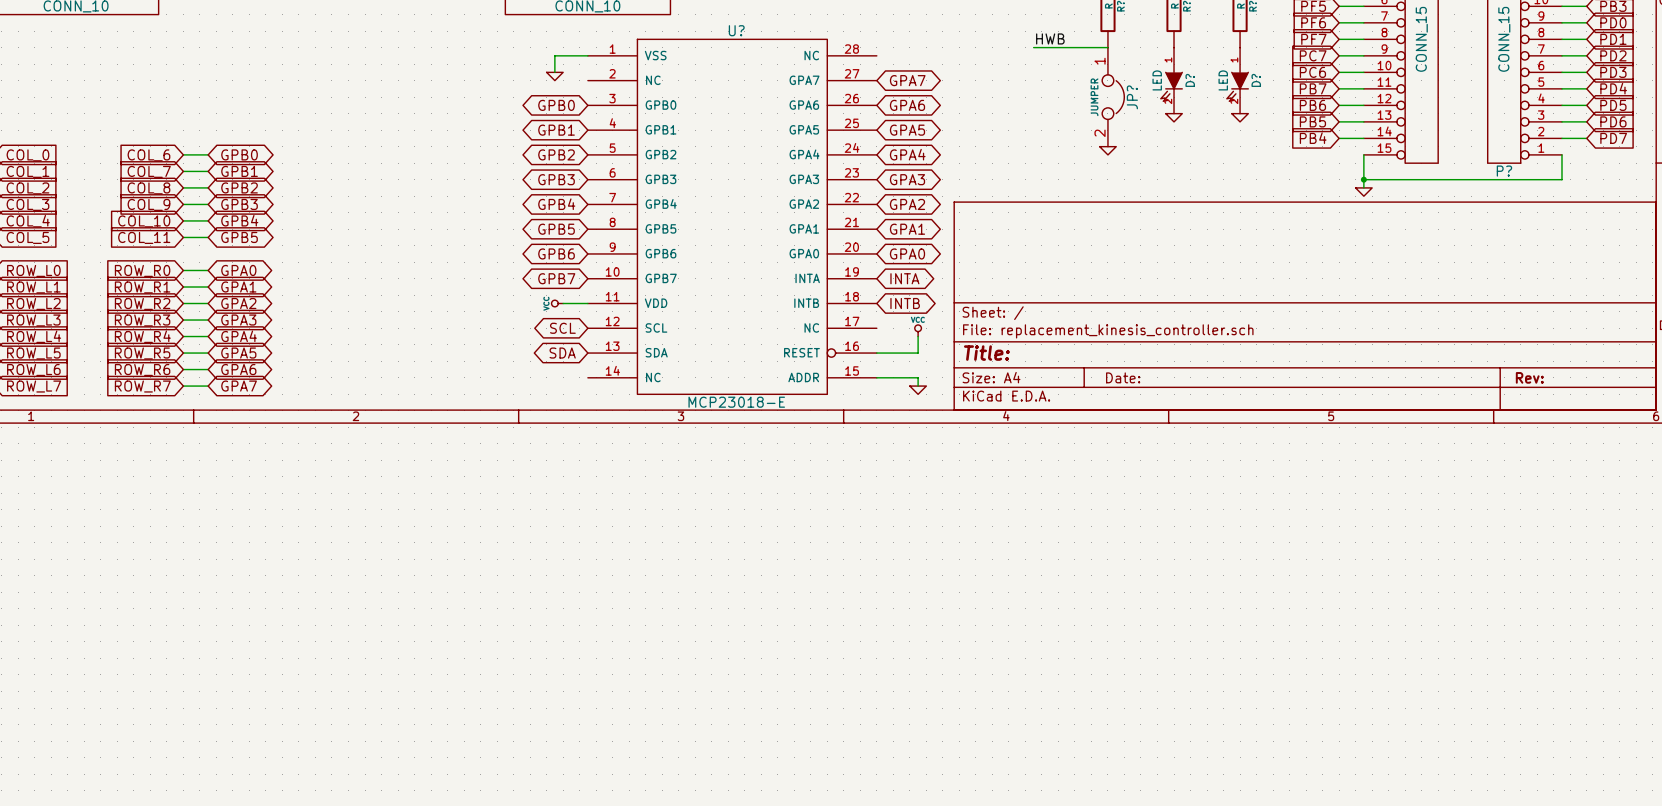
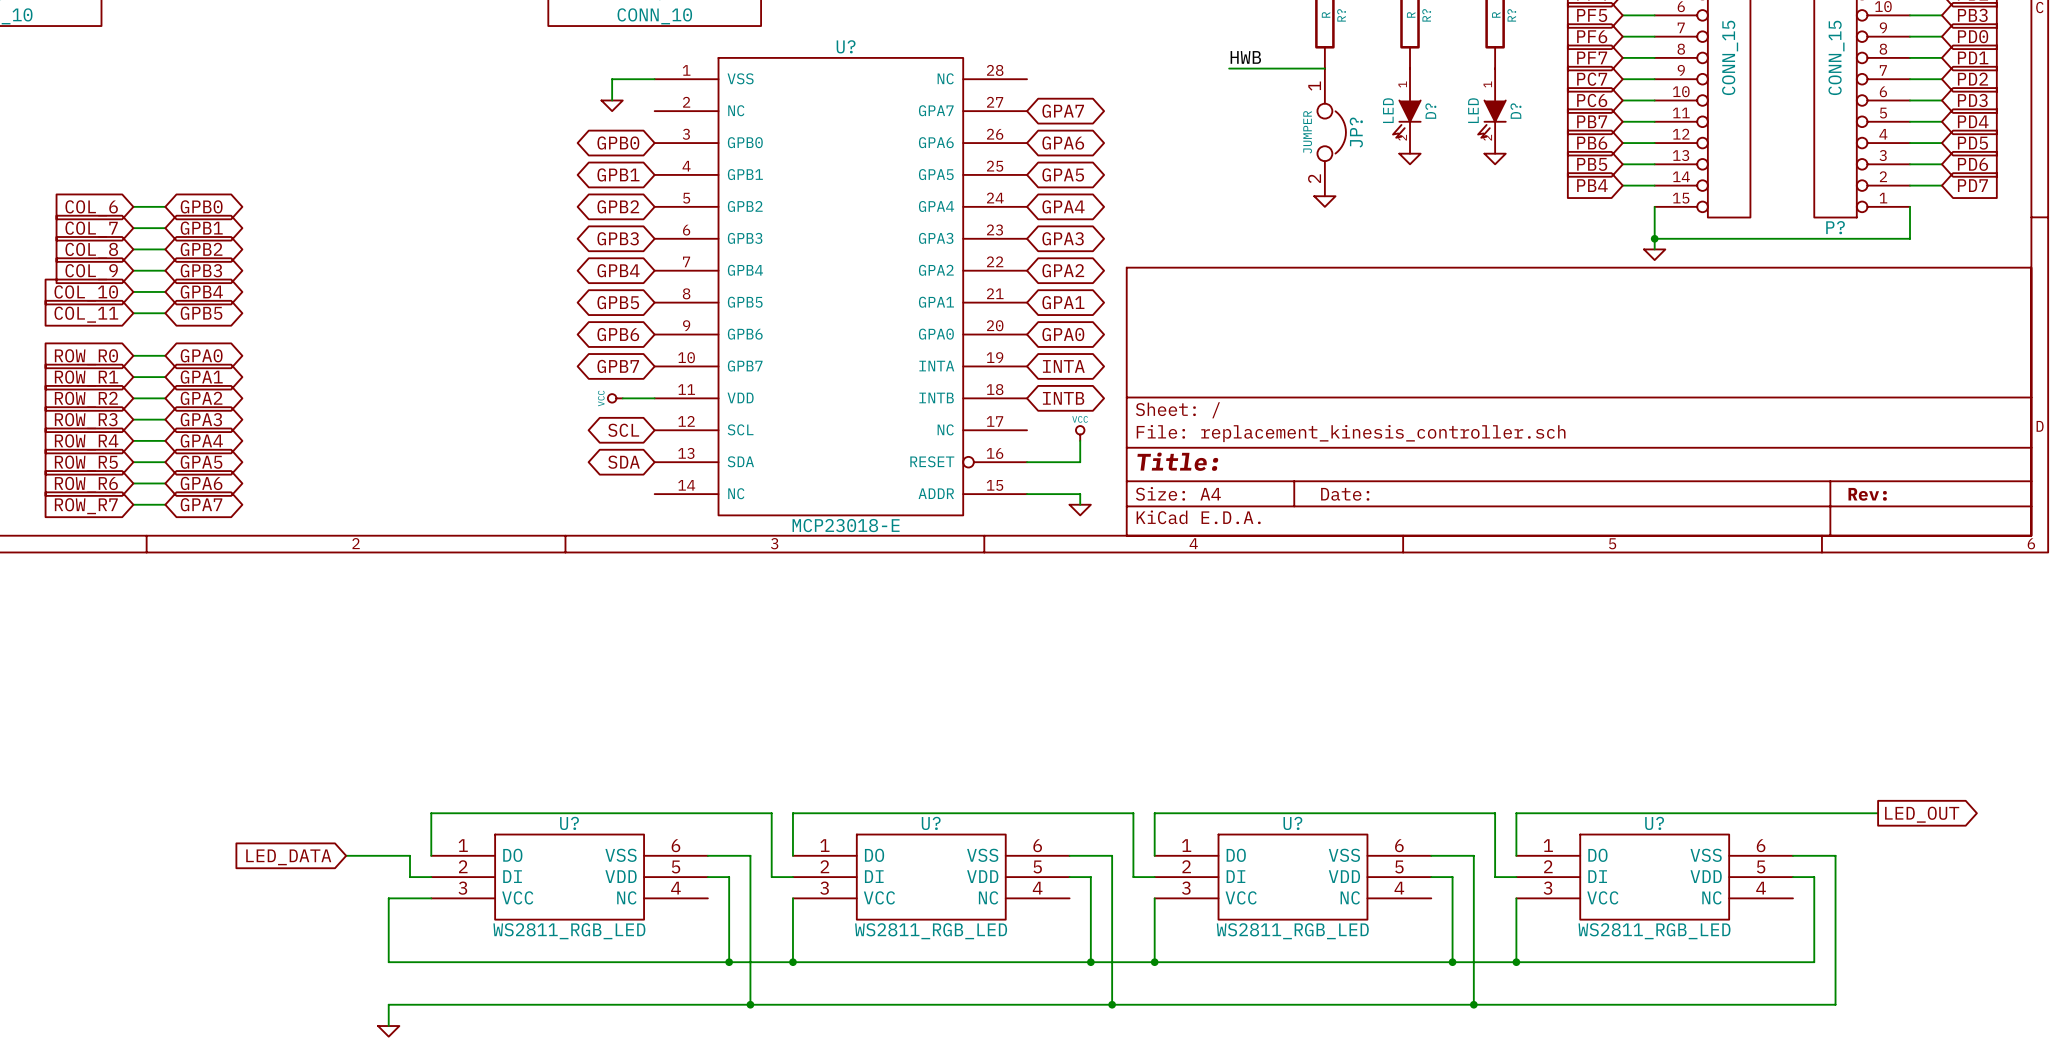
wire: none -> (1878, 813) (1516, 813) (1516, 855)
global label: none -> LED_OUT (1922, 814)
global label: none -> LED_DATA (288, 857)
wire: none -> (346, 855) (410, 855) (410, 877) (431, 877)
wire: none -> (431, 855) (431, 813) (771, 813) (771, 877) (792, 877)
wire: none -> (707, 855) (750, 855) (750, 1004)
wire: none -> (792, 855) (792, 813) (1133, 813) (1133, 877) (1154, 877)
wire: none -> (1069, 855) (1112, 855) (1112, 1004)
wire: none -> (1154, 855) (1154, 813) (1495, 813) (1495, 877) (1516, 877)
wire: none -> (1431, 855) (1473, 855) (1473, 1004)
wire: none -> (1792, 855) (1835, 855) (1835, 1004) (388, 1004) (388, 1026)
U?: none -> WS2811_RGB_LED (569, 877)
wire: none -> (707, 877) (729, 877) (729, 962)
U?: none -> WS2811_RGB_LED (931, 877)
wire: none -> (1069, 877) (1090, 877) (1090, 962)
U?: none -> WS2811_RGB_LED (1292, 877)
wire: none -> (1431, 877) (1452, 877) (1452, 962)
U?: none -> WS2811_RGB_LED (1654, 877)
wire: none -> (1792, 877) (1814, 877) (1814, 962) (388, 962) (388, 898) (431, 898)
wire: none -> (792, 898) (792, 962)
wire: none -> (1154, 898) (1154, 962)
wire: none -> (1516, 898) (1516, 962)
junction: none -> (729, 962)
junction: none -> (792, 962)
junction: none -> (1090, 962)
junction: none -> (1154, 962)
junction: none -> (1452, 962)
junction: none -> (1516, 962)
junction: none -> (750, 1004)
junction: none -> (1112, 1004)
junction: none -> (1473, 1004)
power symbol: none -> (388, 1031)

